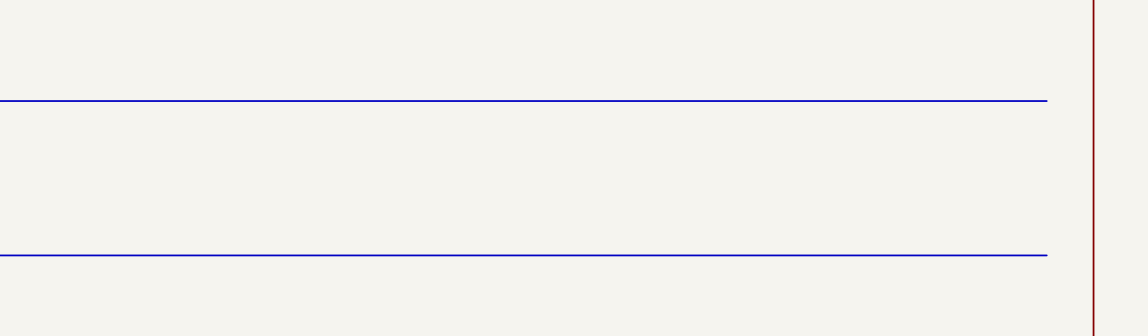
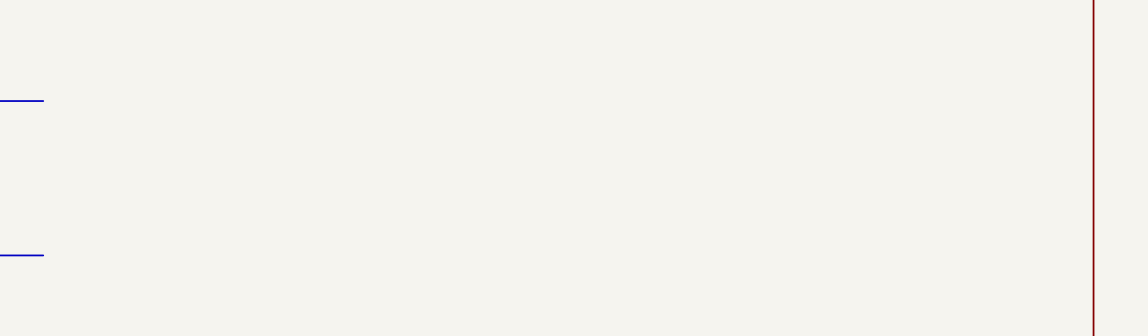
bus: (43, 101) (1046, 101) -> none
bus: (43, 255) (1046, 255) -> none

